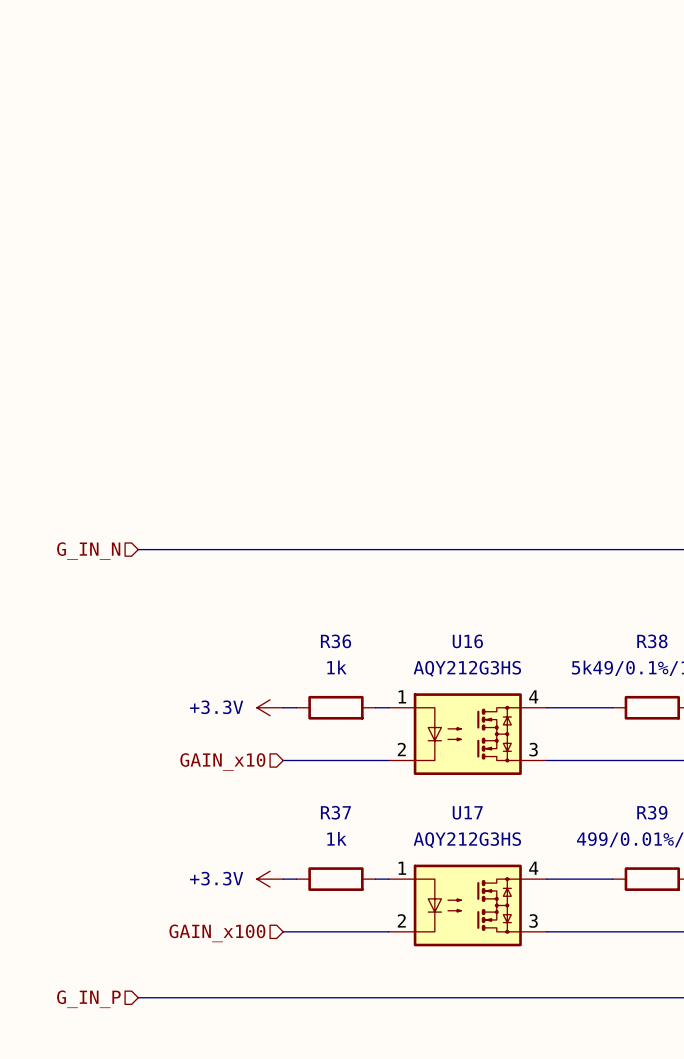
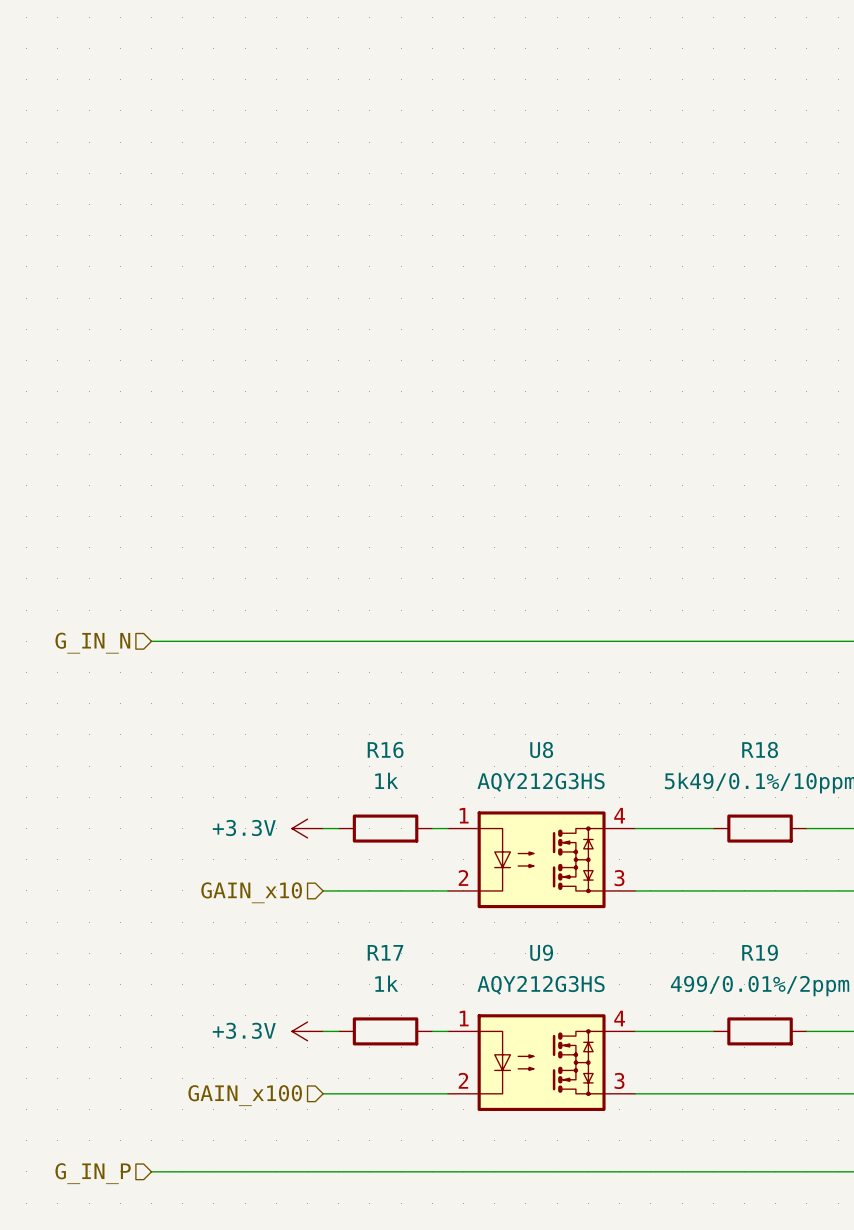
R36 name: R36 (336, 641) -> R16 (385, 749)
U16 name: U16 (467, 641) -> U8 (541, 749)
R38 name: R38 (652, 641) -> R18 (760, 749)
R37 name: R37 (335, 812) -> R17 (385, 952)
U17 name: U17 (467, 812) -> U9 (541, 952)
R39 name: R39 (652, 812) -> R19 (760, 952)

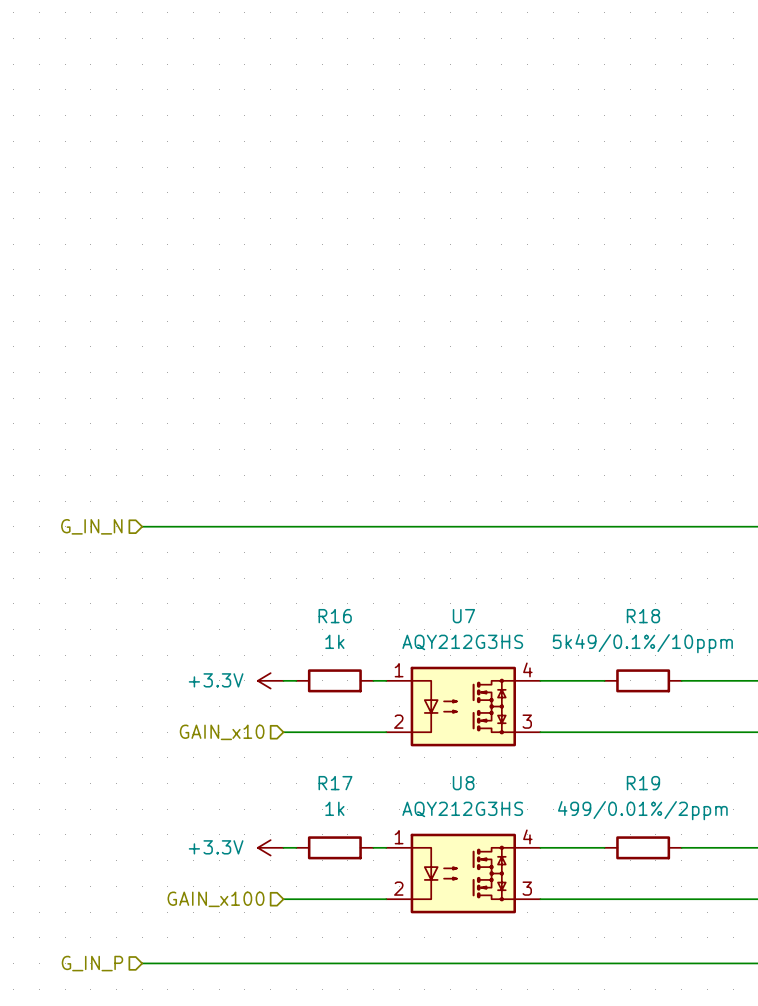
U8 name: U8 (541, 749) -> U7 (463, 616)
U9 name: U9 (541, 952) -> U8 (463, 783)

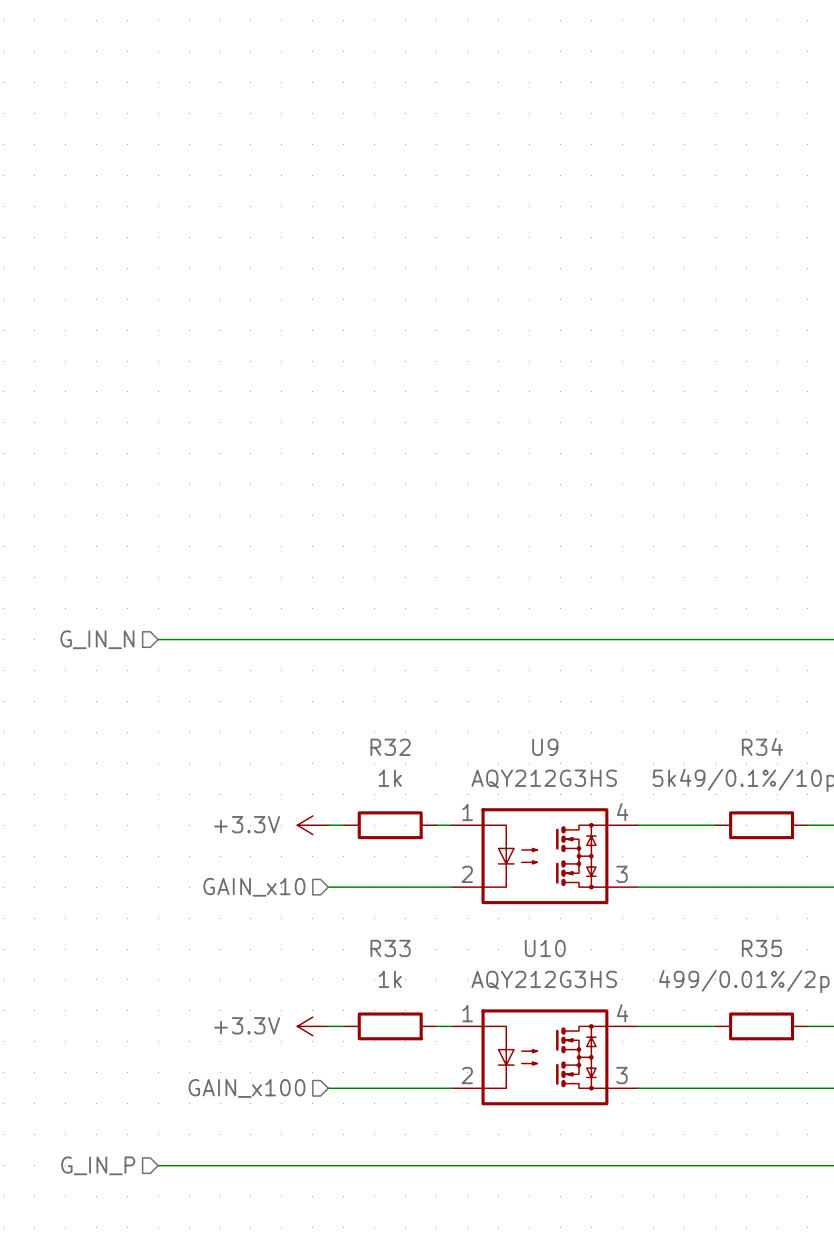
R16 name: R16 (335, 616) -> R32 (390, 747)
U7 name: U7 (463, 616) -> U9 (545, 747)
R18 name: R18 (643, 616) -> R34 (762, 746)
R17 name: R17 (335, 783) -> R33 (390, 948)
U8 name: U8 (463, 783) -> U10 (545, 948)
R19 name: R19 (643, 783) -> R35 (761, 948)

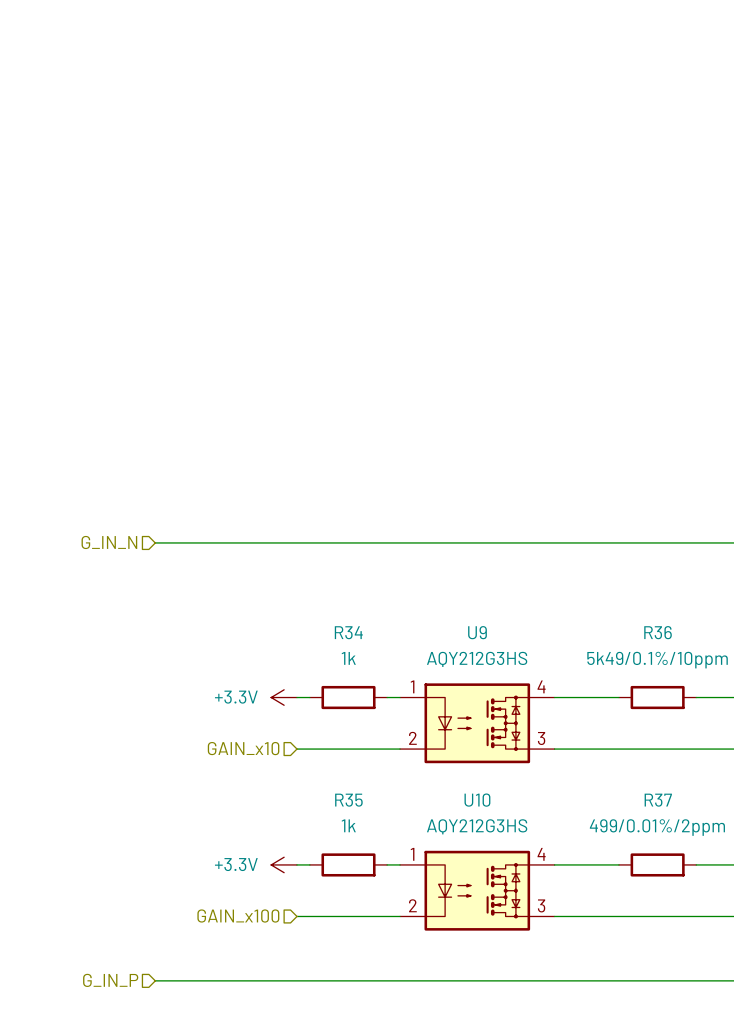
R34 name: R34 (762, 746) -> R36 (658, 632)
R32 name: R32 (390, 747) -> R34 (348, 632)
R33 name: R33 (390, 948) -> R35 (348, 800)
R35 name: R35 (761, 948) -> R37 (658, 800)

